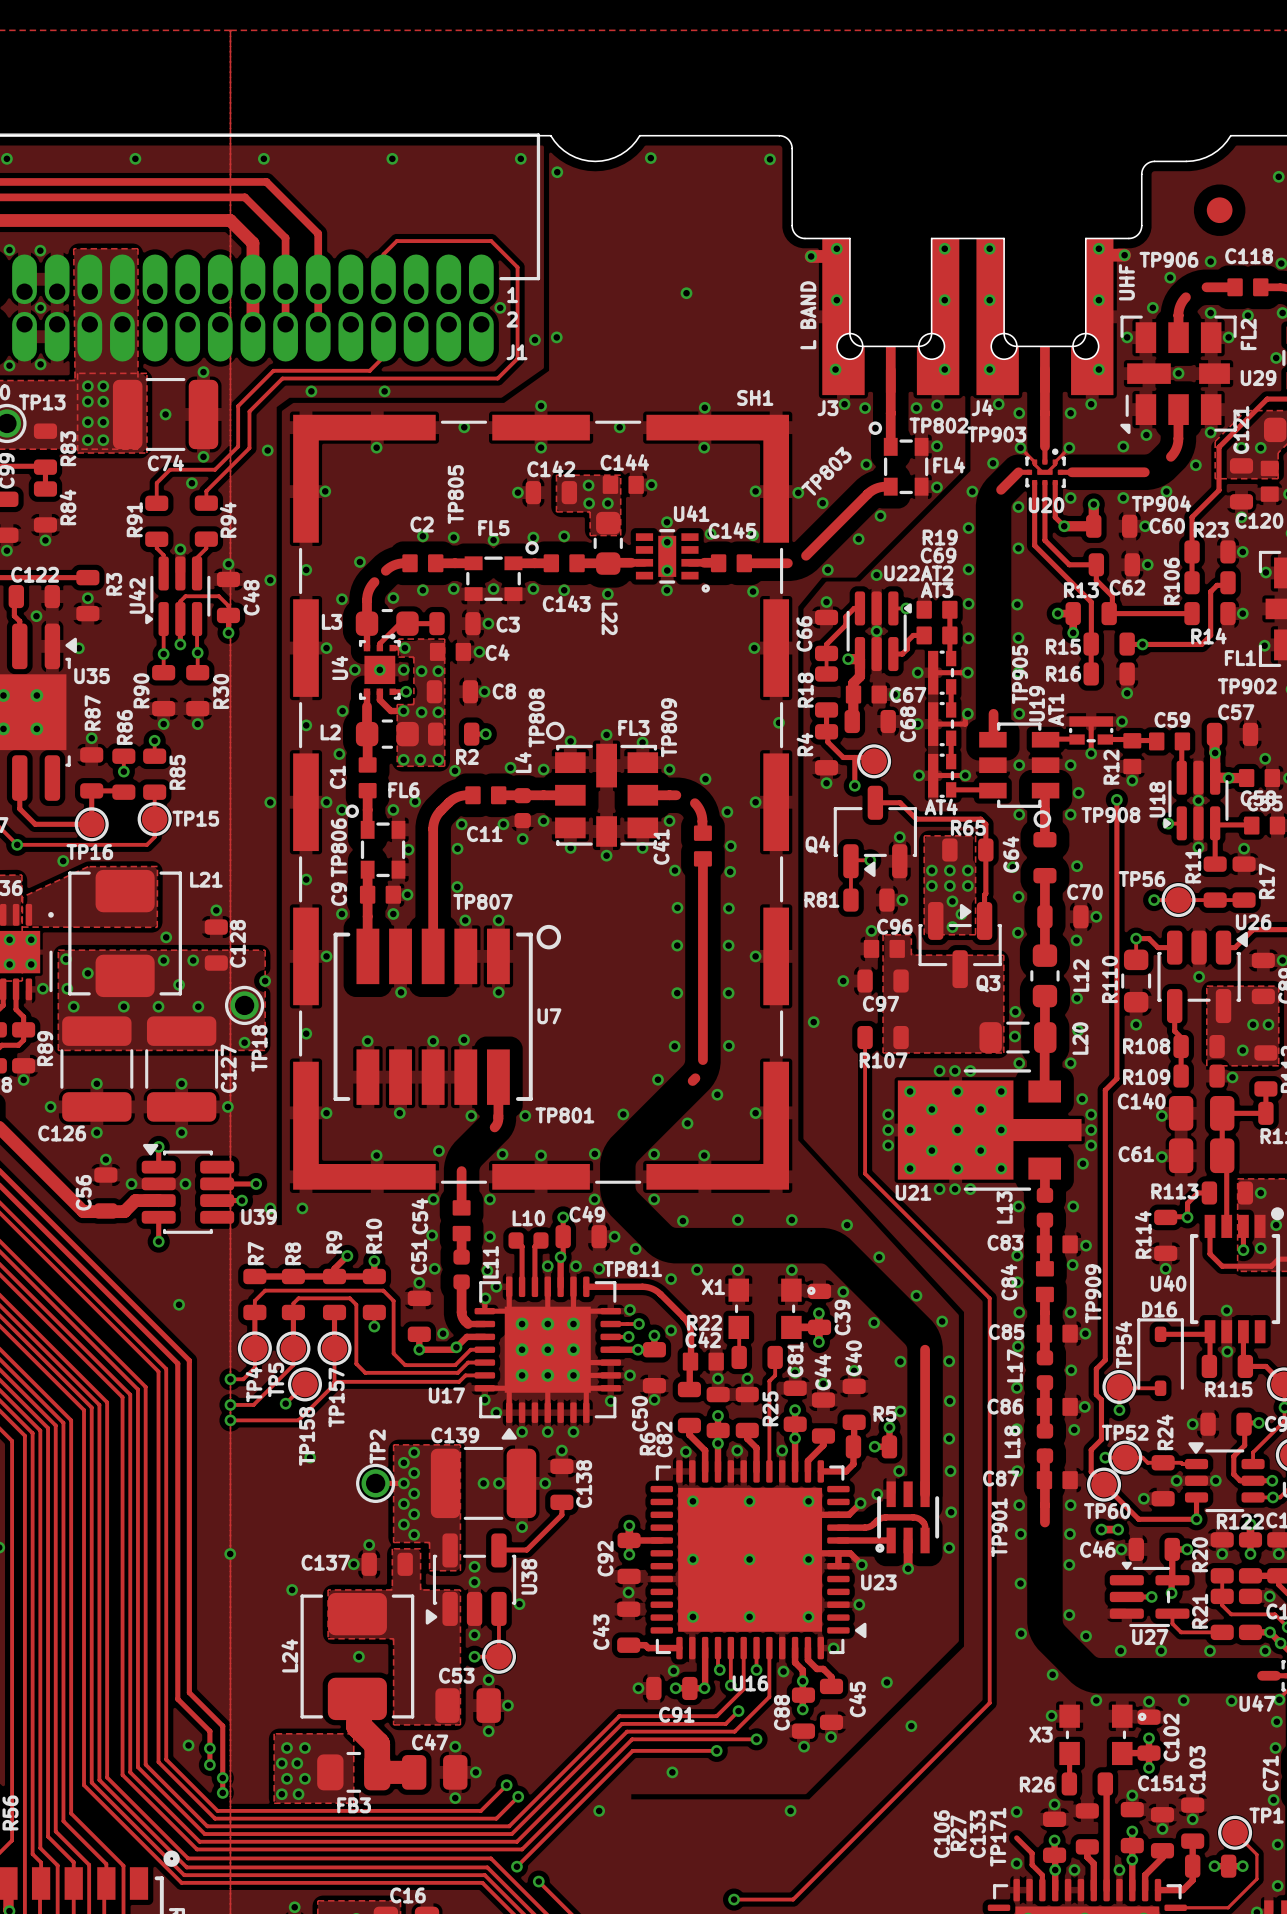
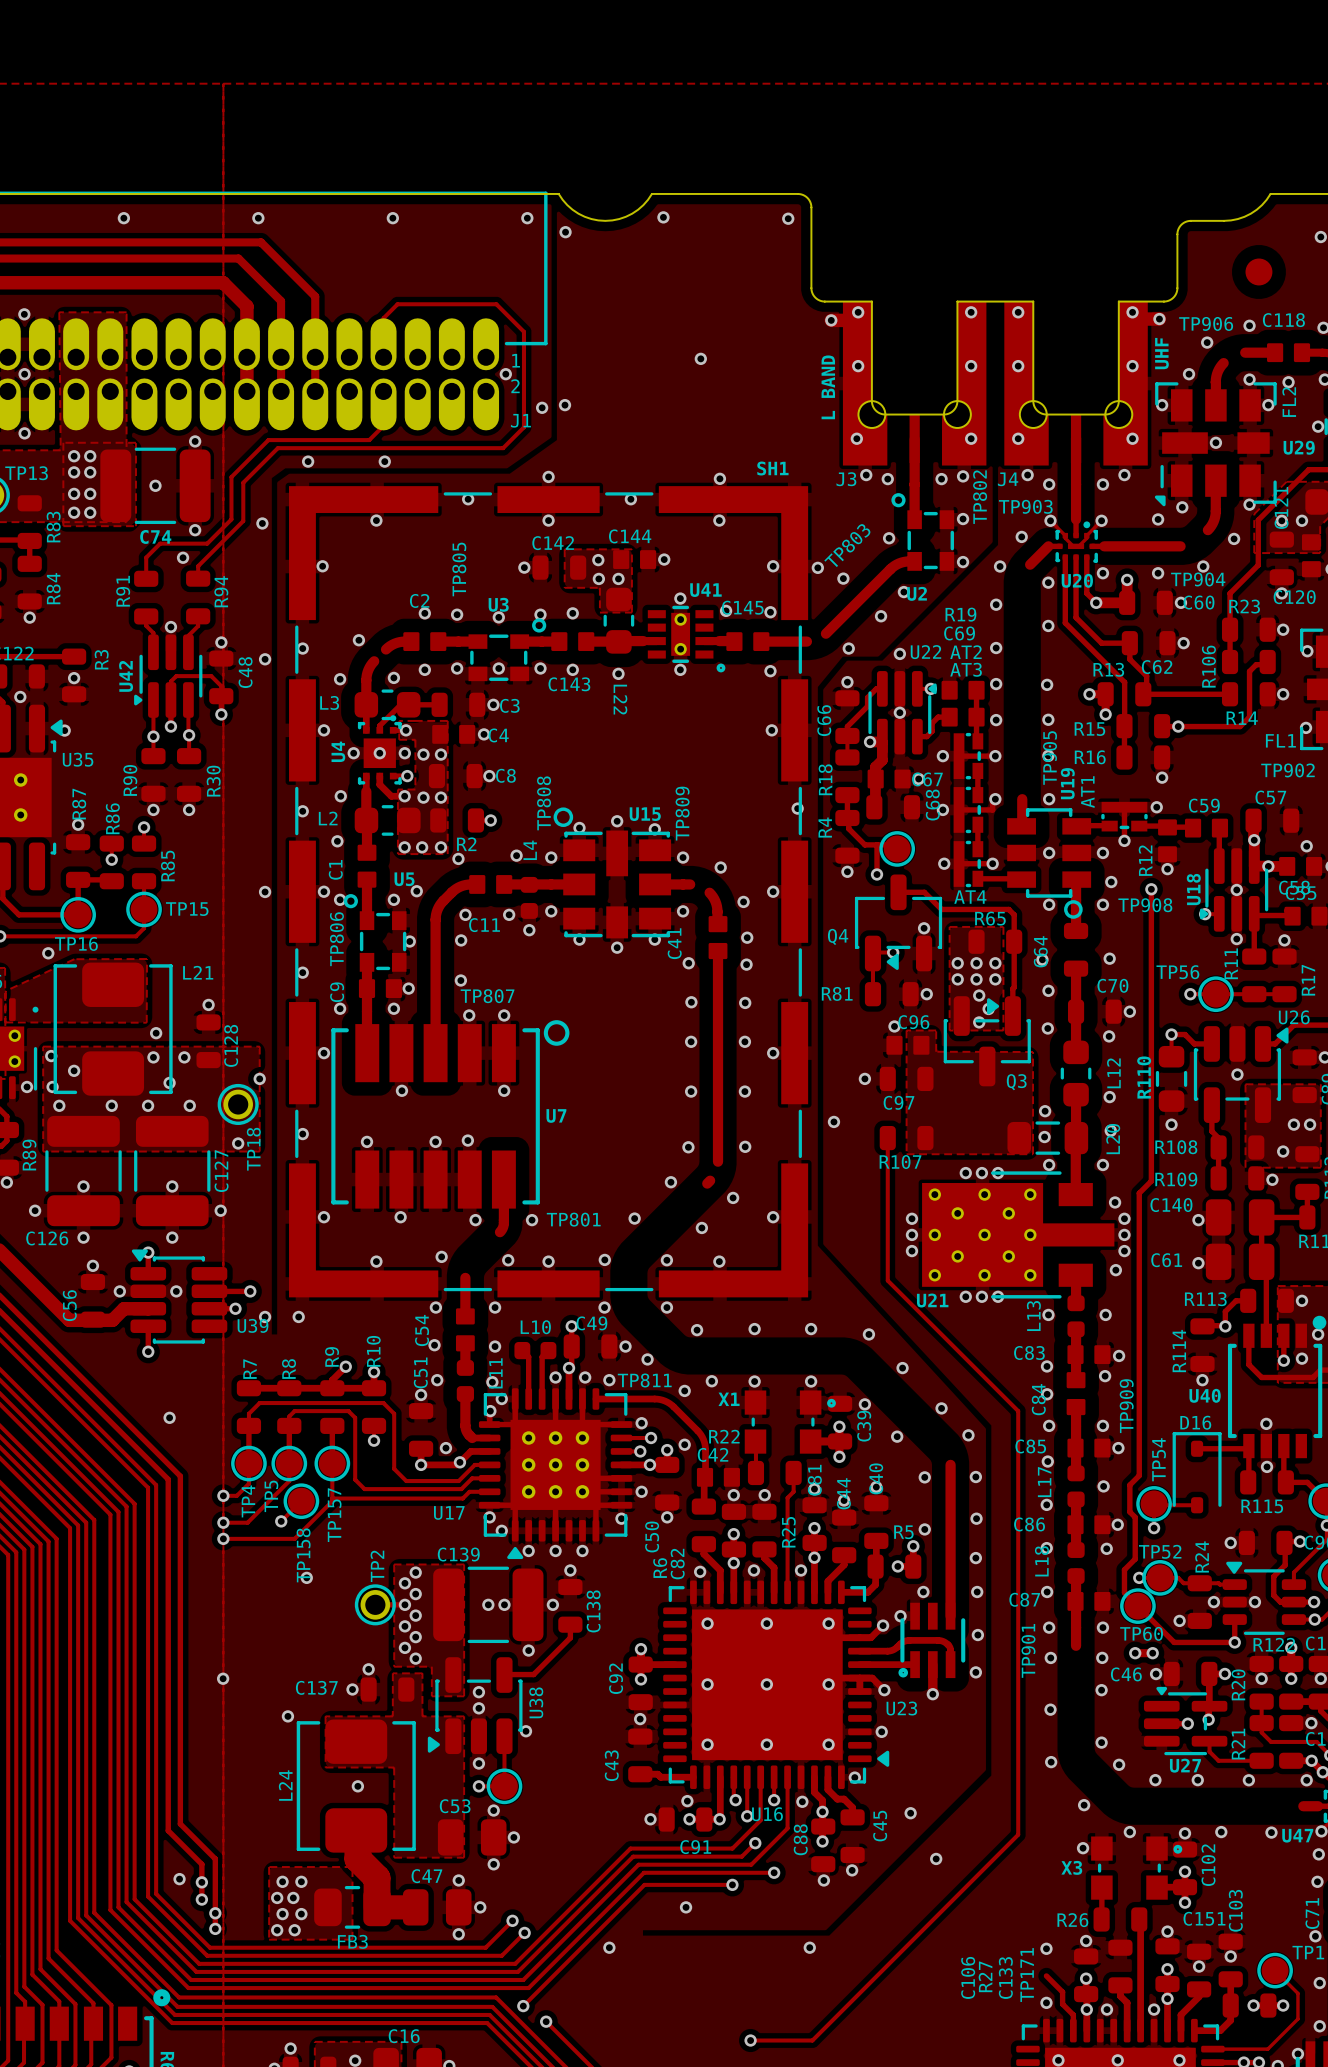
TP802 name rotation: 0° (938, 425) -> 90° counterclockwise (980, 497)
FL4 name: FL4 (949, 465) -> U2 (917, 593)
FL5 name: FL5 (493, 528) -> U3 (498, 604)
FL3 name: FL3 (633, 727) -> U15 (645, 814)
FL6 name: FL6 (403, 790) -> U5 (404, 879)

